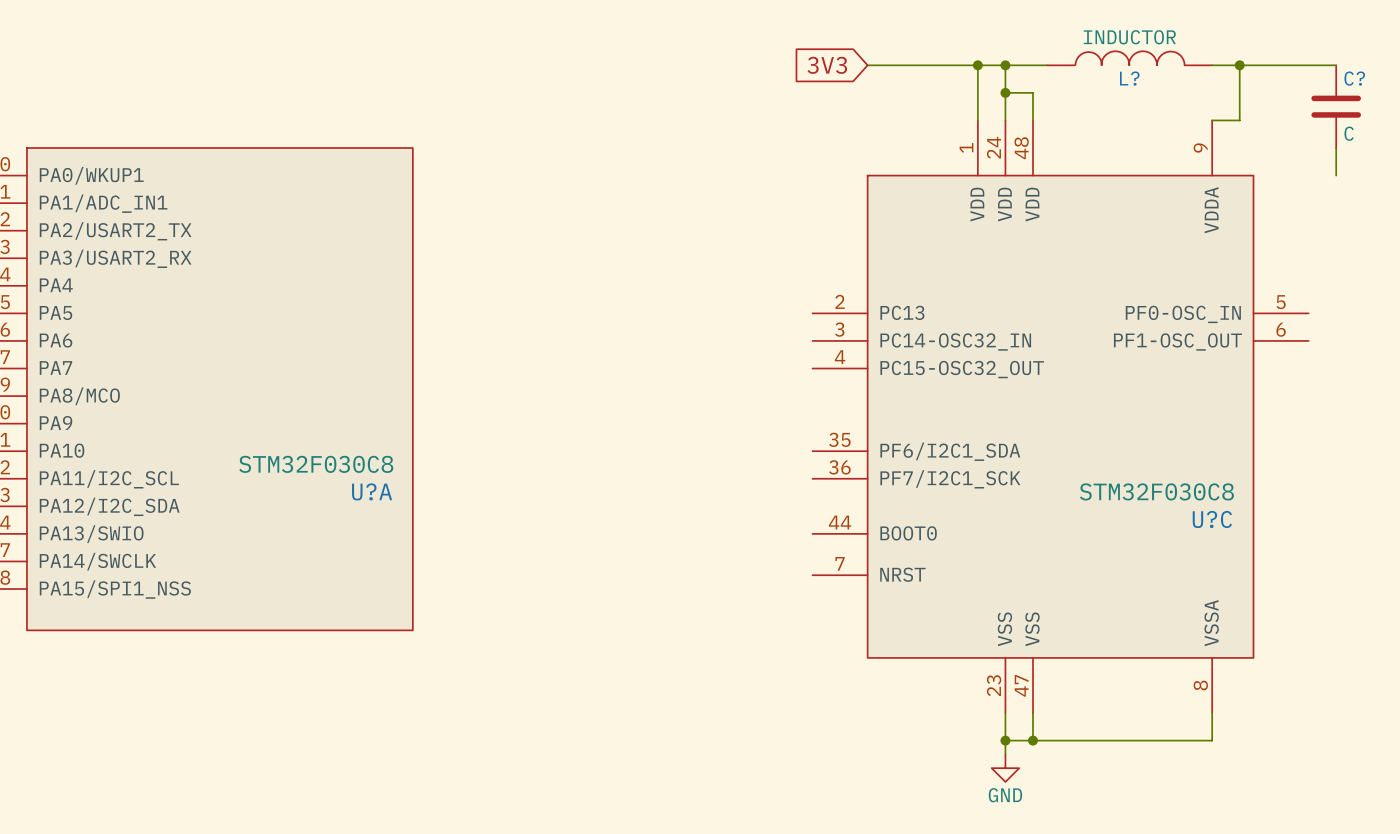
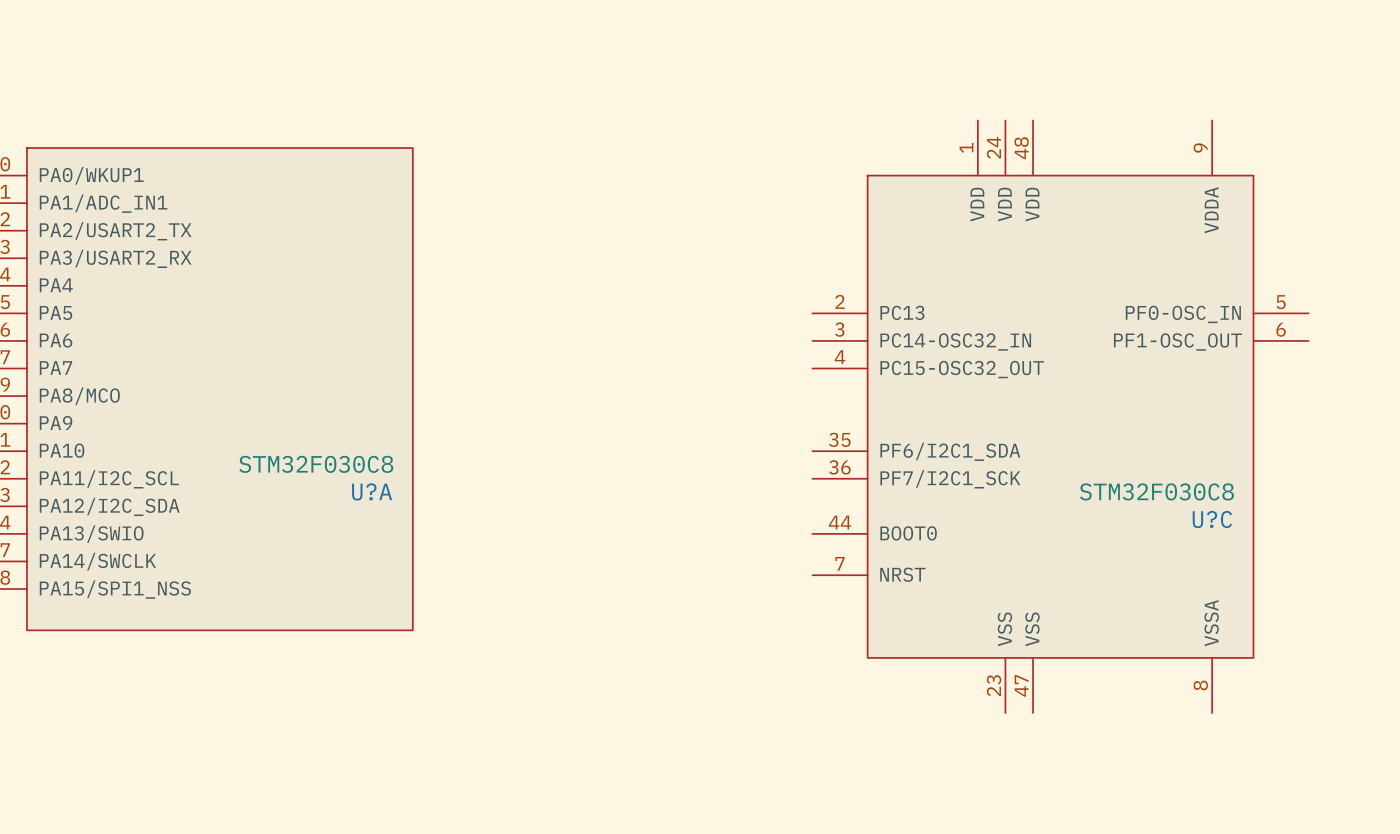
L?: INDUCTOR (1129, 58) -> none
global label: 3V3 (827, 65) -> none
wire: (867, 65) (1046, 65) -> none
wire: (977, 65) (977, 120) -> none
junction: (977, 65) -> none
wire: (1005, 65) (1005, 120) -> none
junction: (1005, 65) -> none
wire: (1212, 65) (1336, 65) -> none
wire: (1239, 65) (1239, 120) (1212, 120) -> none
junction: (1239, 65) -> none
wire: (1005, 92) (1033, 92) (1033, 120) -> none
junction: (1005, 92) -> none
C?: C (1336, 106) -> none
wire: (1336, 148) (1336, 175) -> none
wire: (1005, 713) (1005, 754) -> none
wire: (1033, 713) (1033, 740) -> none
wire: (1212, 713) (1212, 740) (1005, 740) -> none
junction: (1005, 740) -> none
junction: (1033, 740) -> none
power symbol: GND (1005, 768) -> none

